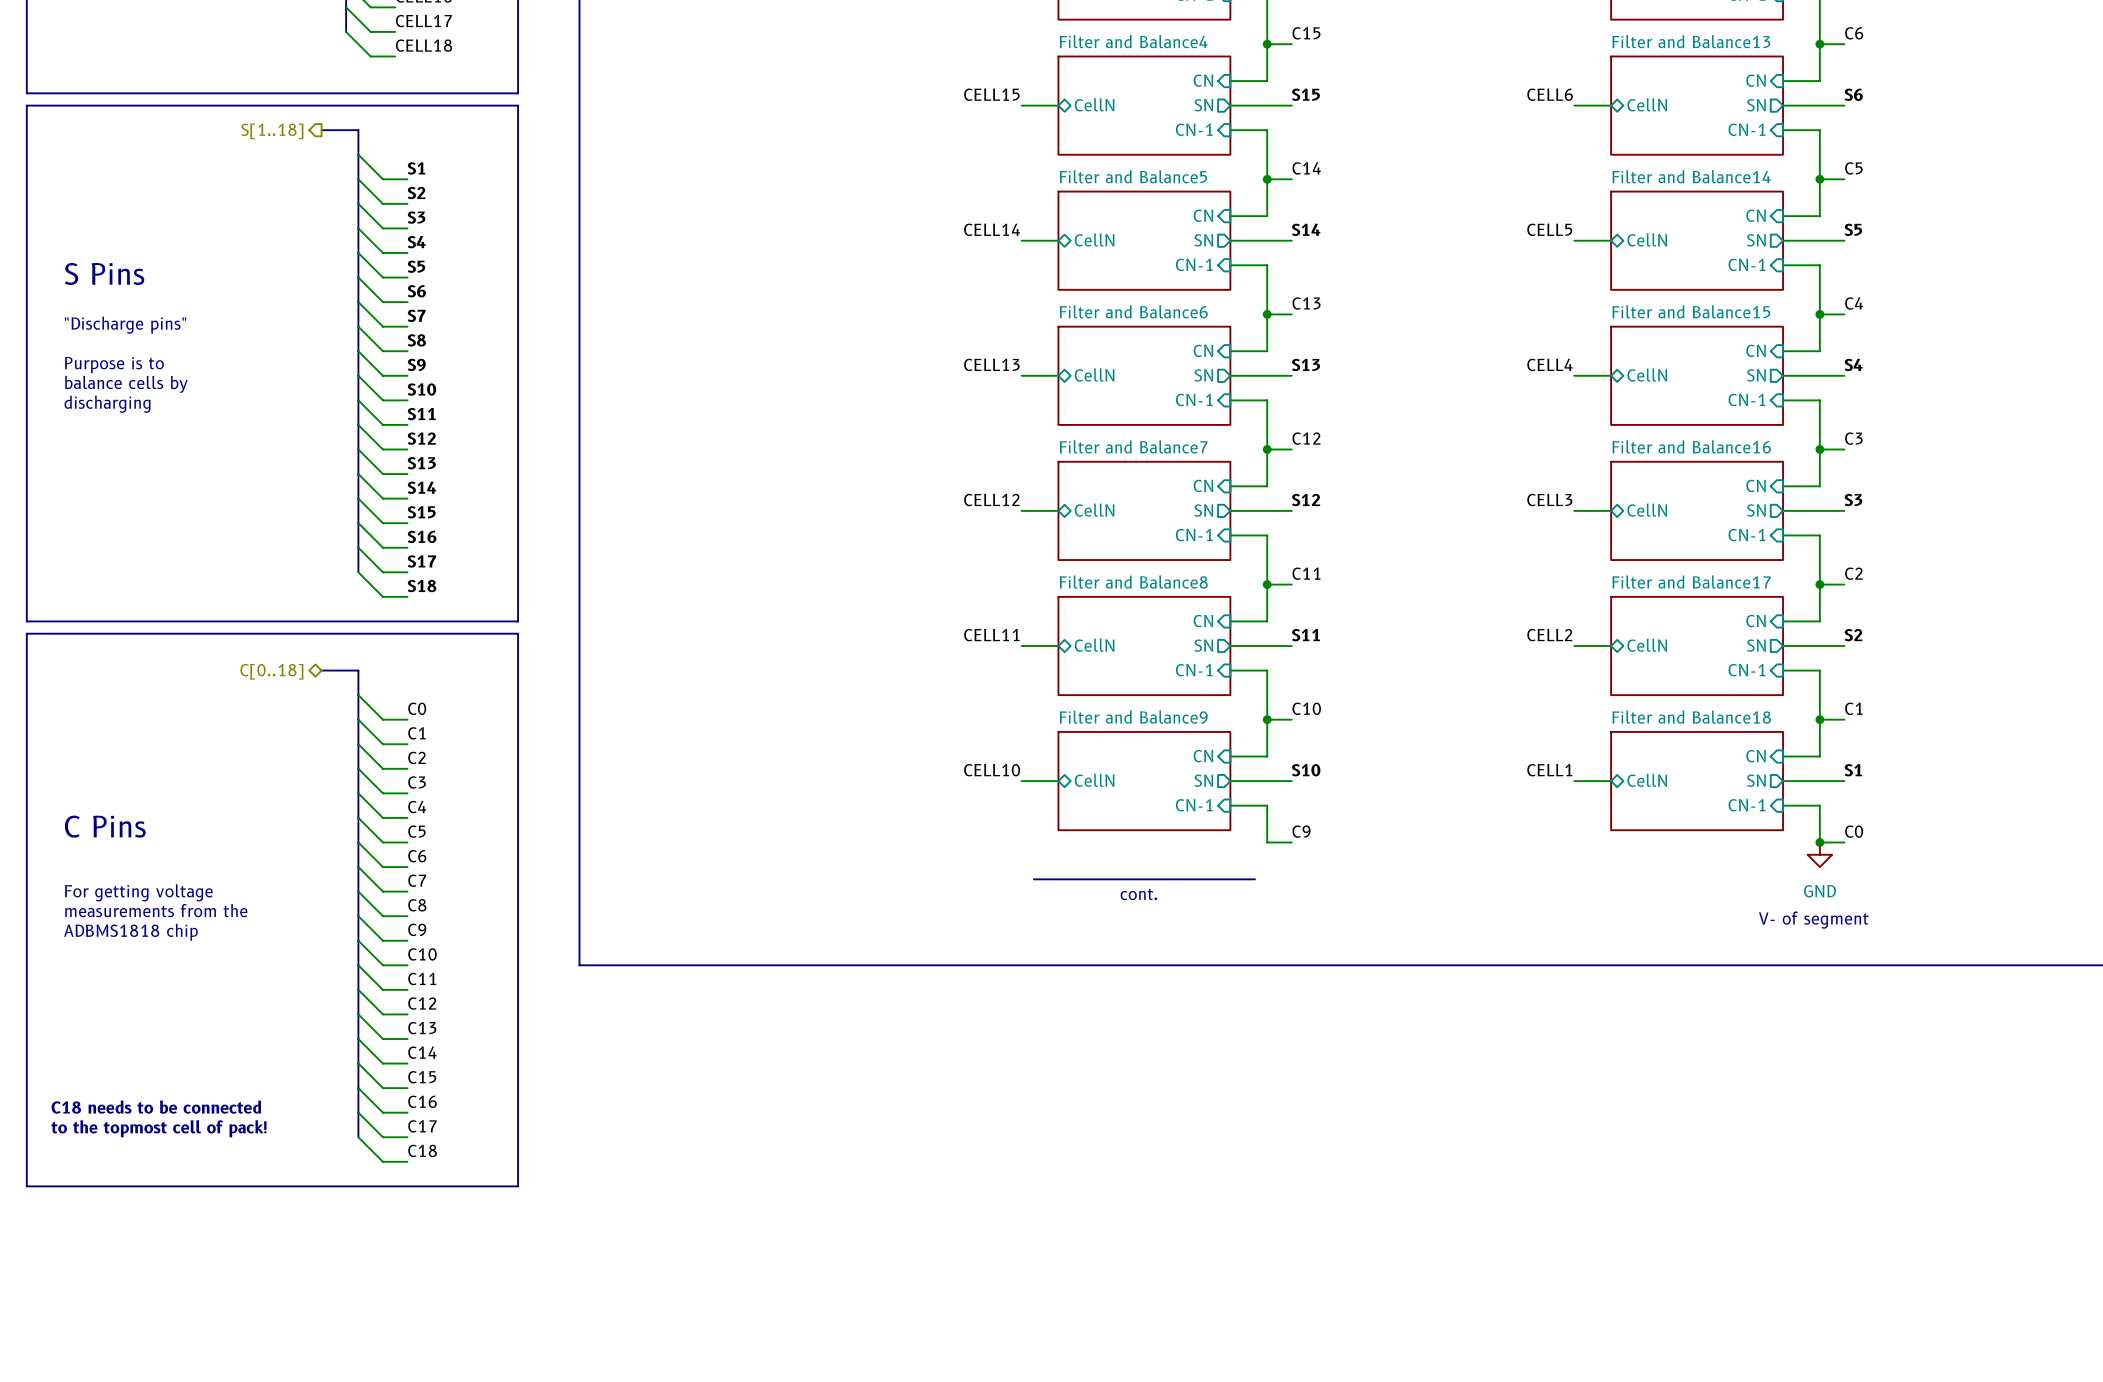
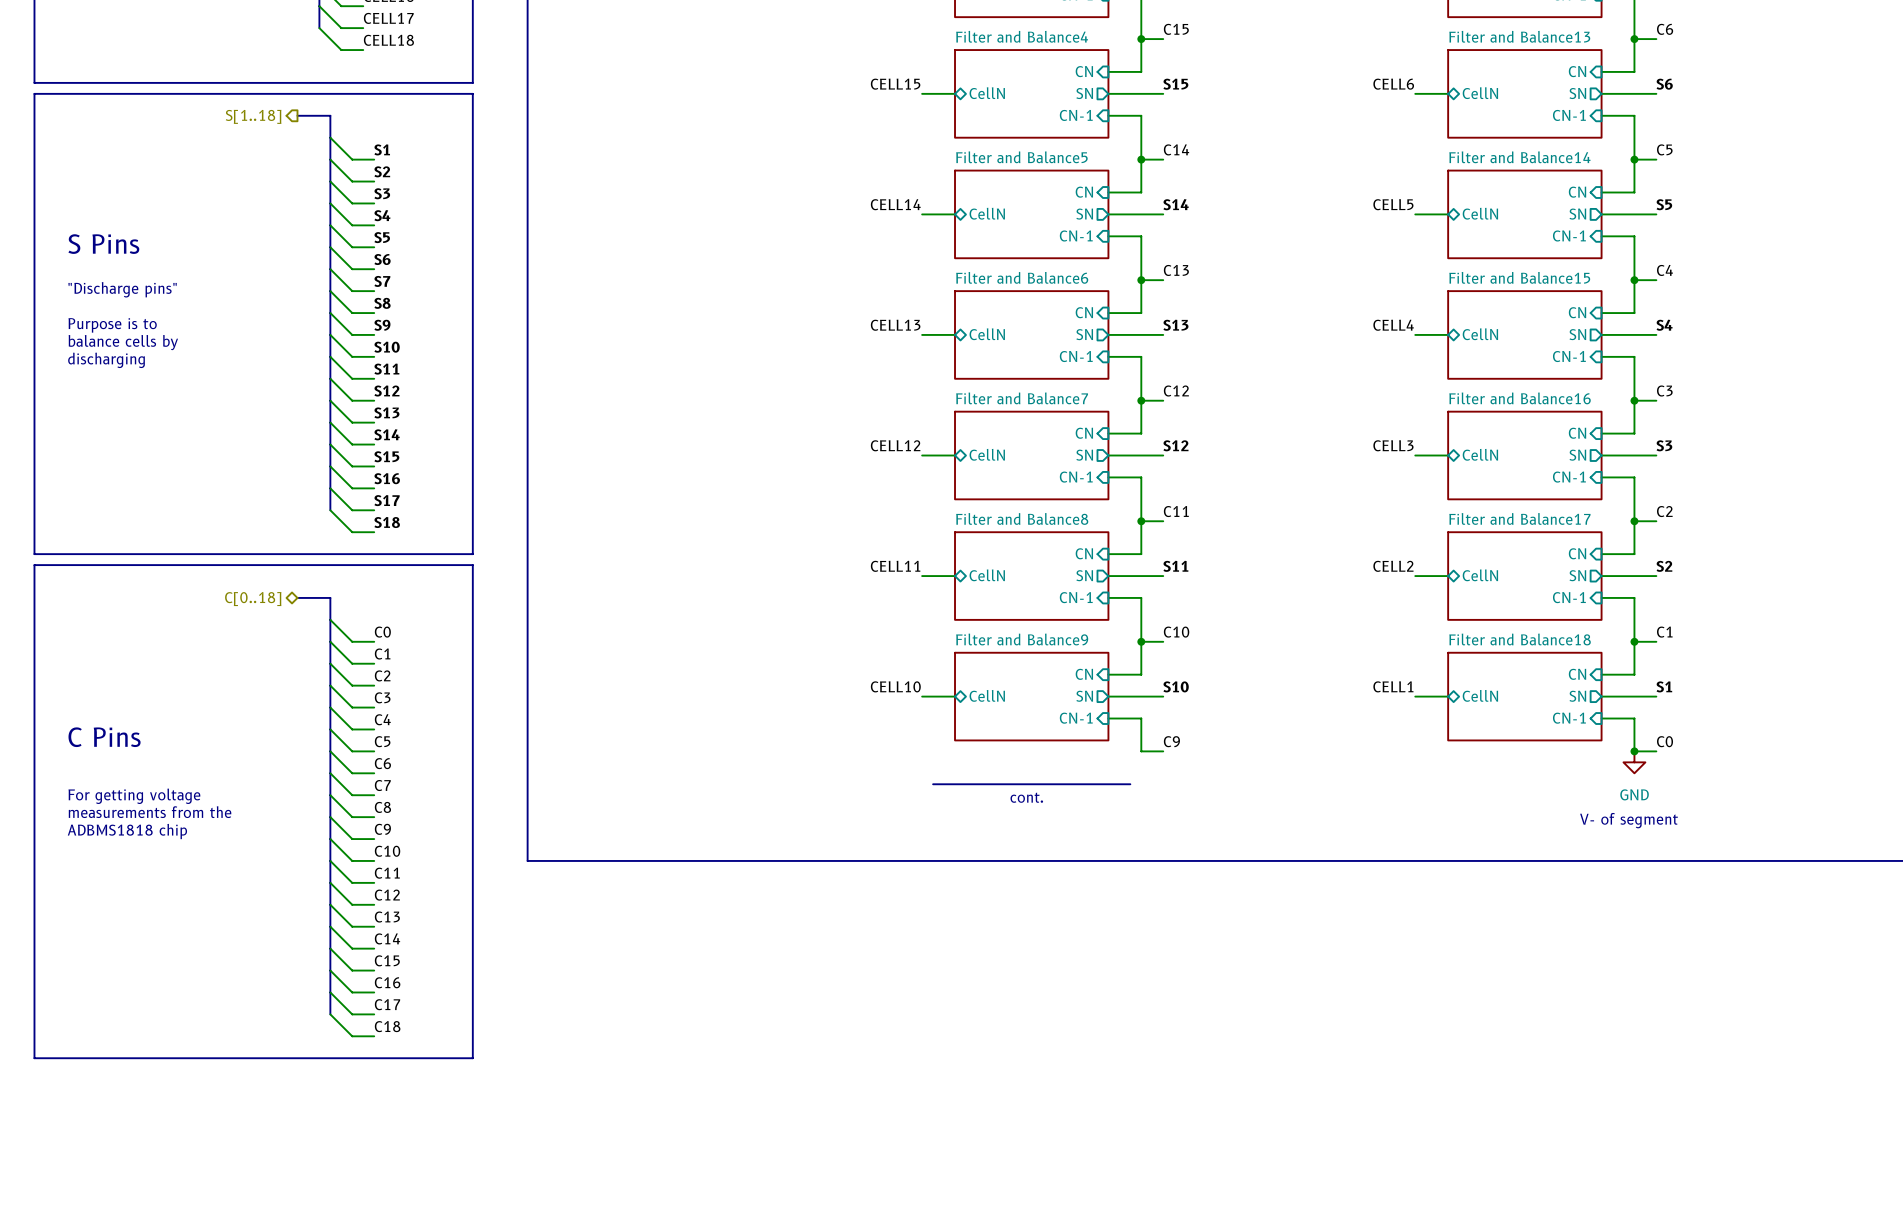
text: C18 needs to be connected (156, 1107) -> none
text: to the topmost cell of pack! (158, 1128) -> none

